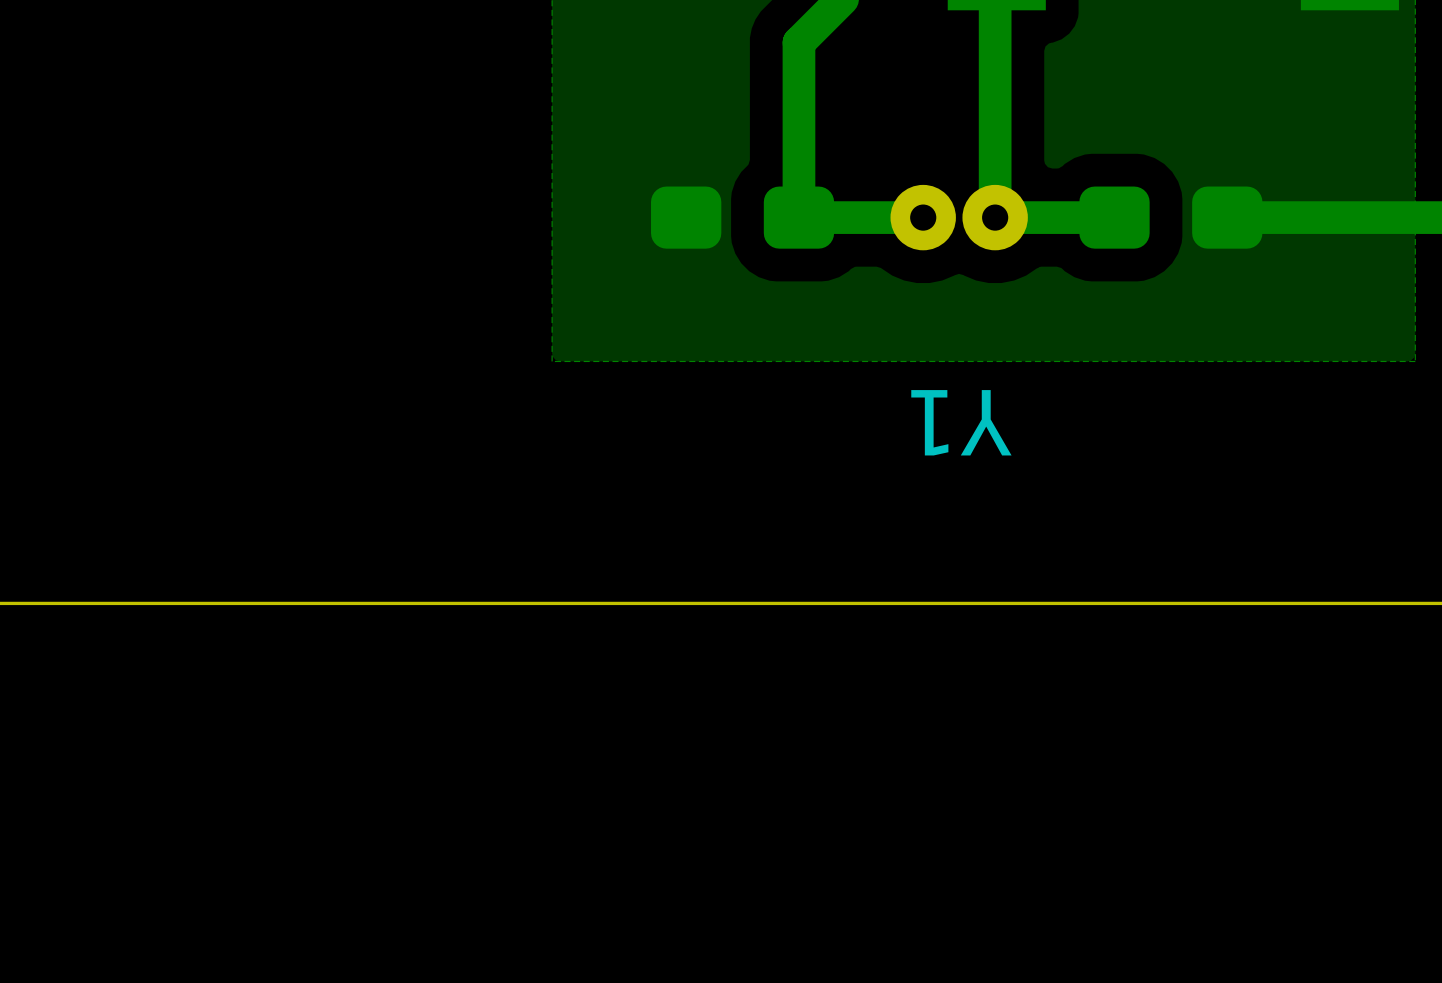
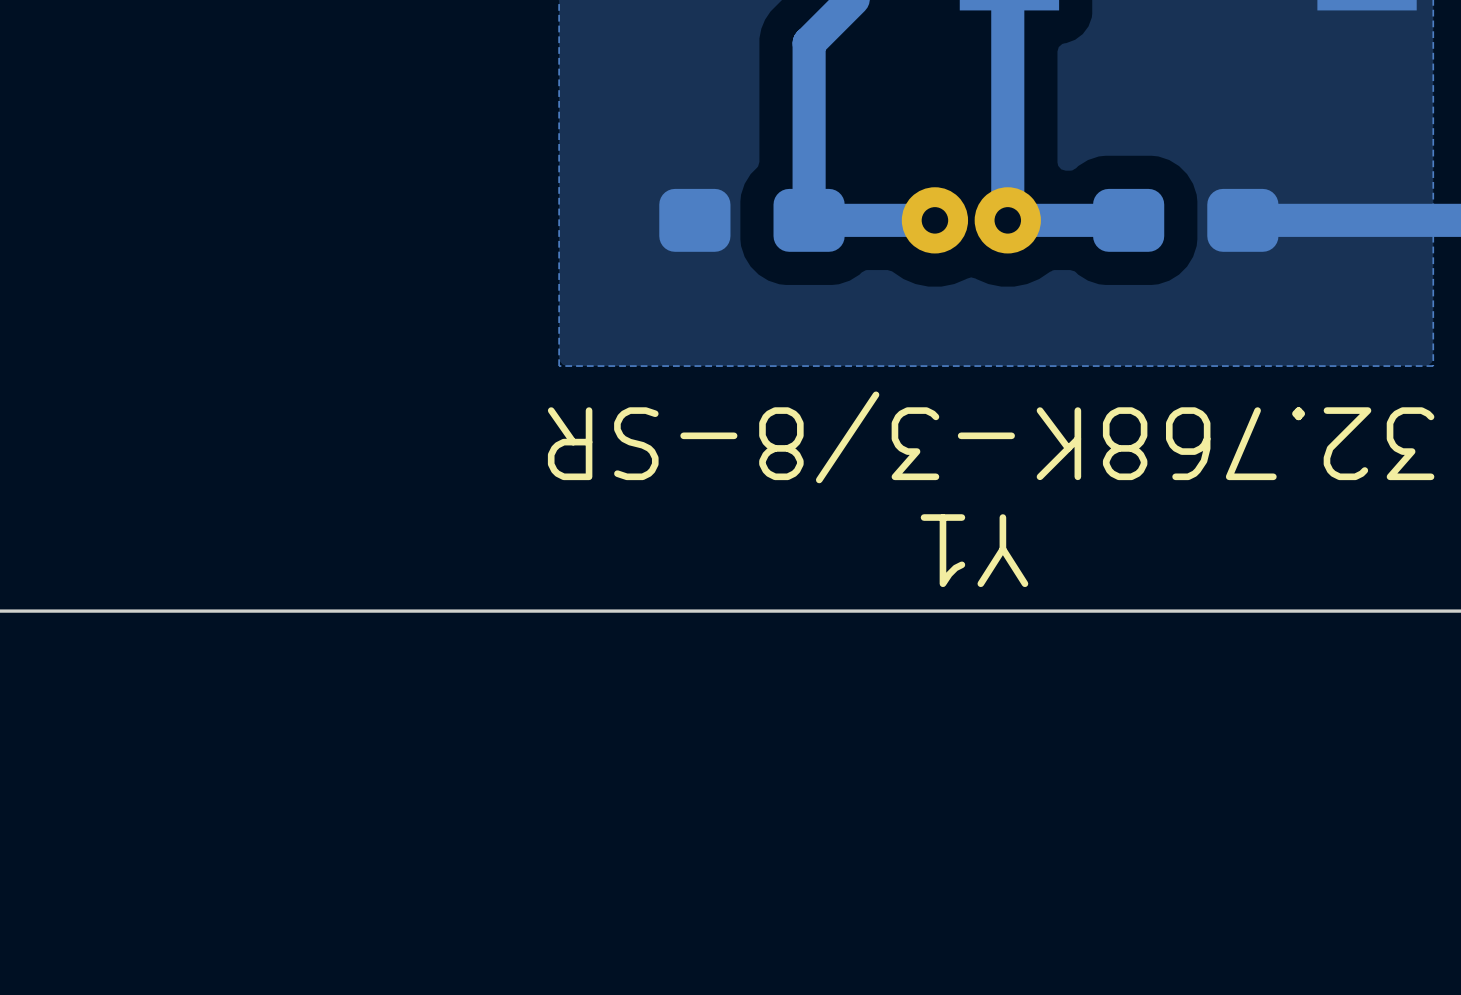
Y1 name position: Y1 (961, 422) -> Y1 (974, 550)
Y1 text: none -> 32.768K-3/8-SR (991, 437)

